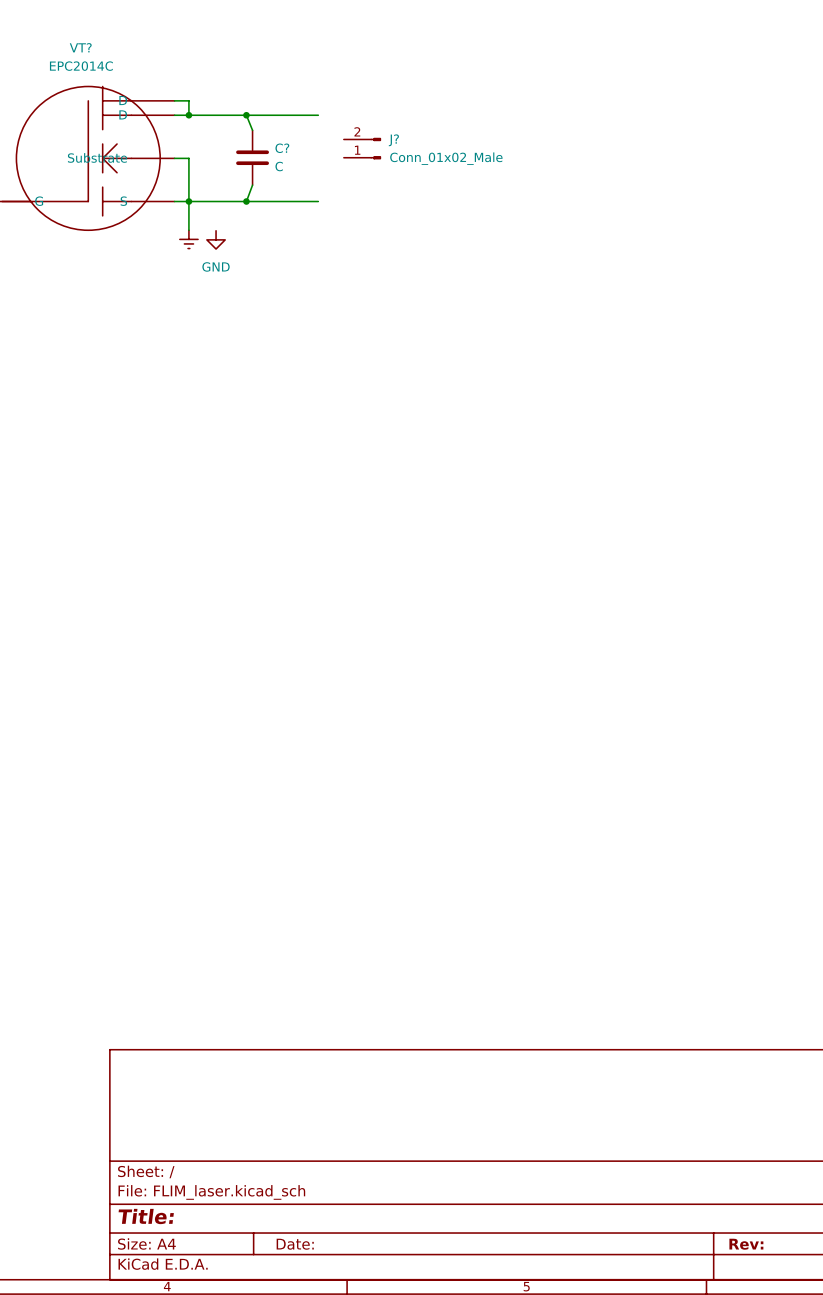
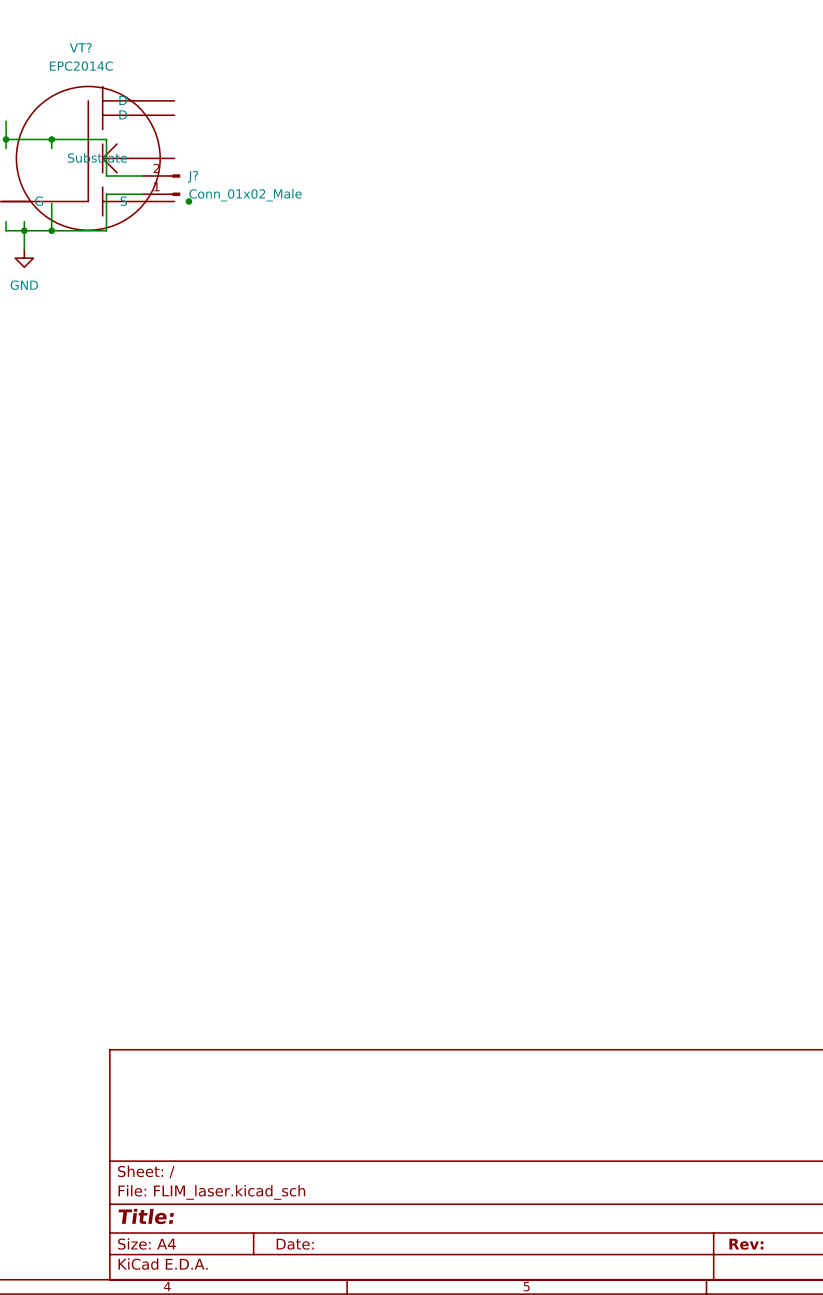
wire: (174, 100) (188, 100) (188, 115) -> none
wire: (174, 115) (318, 115) -> none
junction: (188, 115) -> none
wire: (246, 115) (252, 130) -> none
junction: (246, 115) -> none
wire: none -> (6, 121) (6, 148)
wire: none -> (6, 139) (106, 139) (106, 175) (143, 175)
junction: none -> (6, 139)
wire: none -> (51, 139) (51, 148)
junction: none -> (51, 139)
J?: Conn_01x02_Male (362, 148) -> none
C?: C (252, 157) -> none
wire: (174, 158) (188, 158) (188, 230) -> none
J?: none -> Conn_01x02_Male (161, 185)
wire: (252, 185) (246, 201) -> none
wire: none -> (143, 194) (106, 194) (106, 230) (6, 230) (6, 221)
wire: (174, 201) (318, 201) -> none
junction: (246, 201) -> none
wire: none -> (51, 203) (51, 230)
wire: none -> (24, 221) (24, 249)
junction: none -> (24, 230)
junction: none -> (51, 230)
power symbol: (188, 239) -> none
power symbol: GND (216, 239) -> none
power symbol: none -> GND (24, 258)

